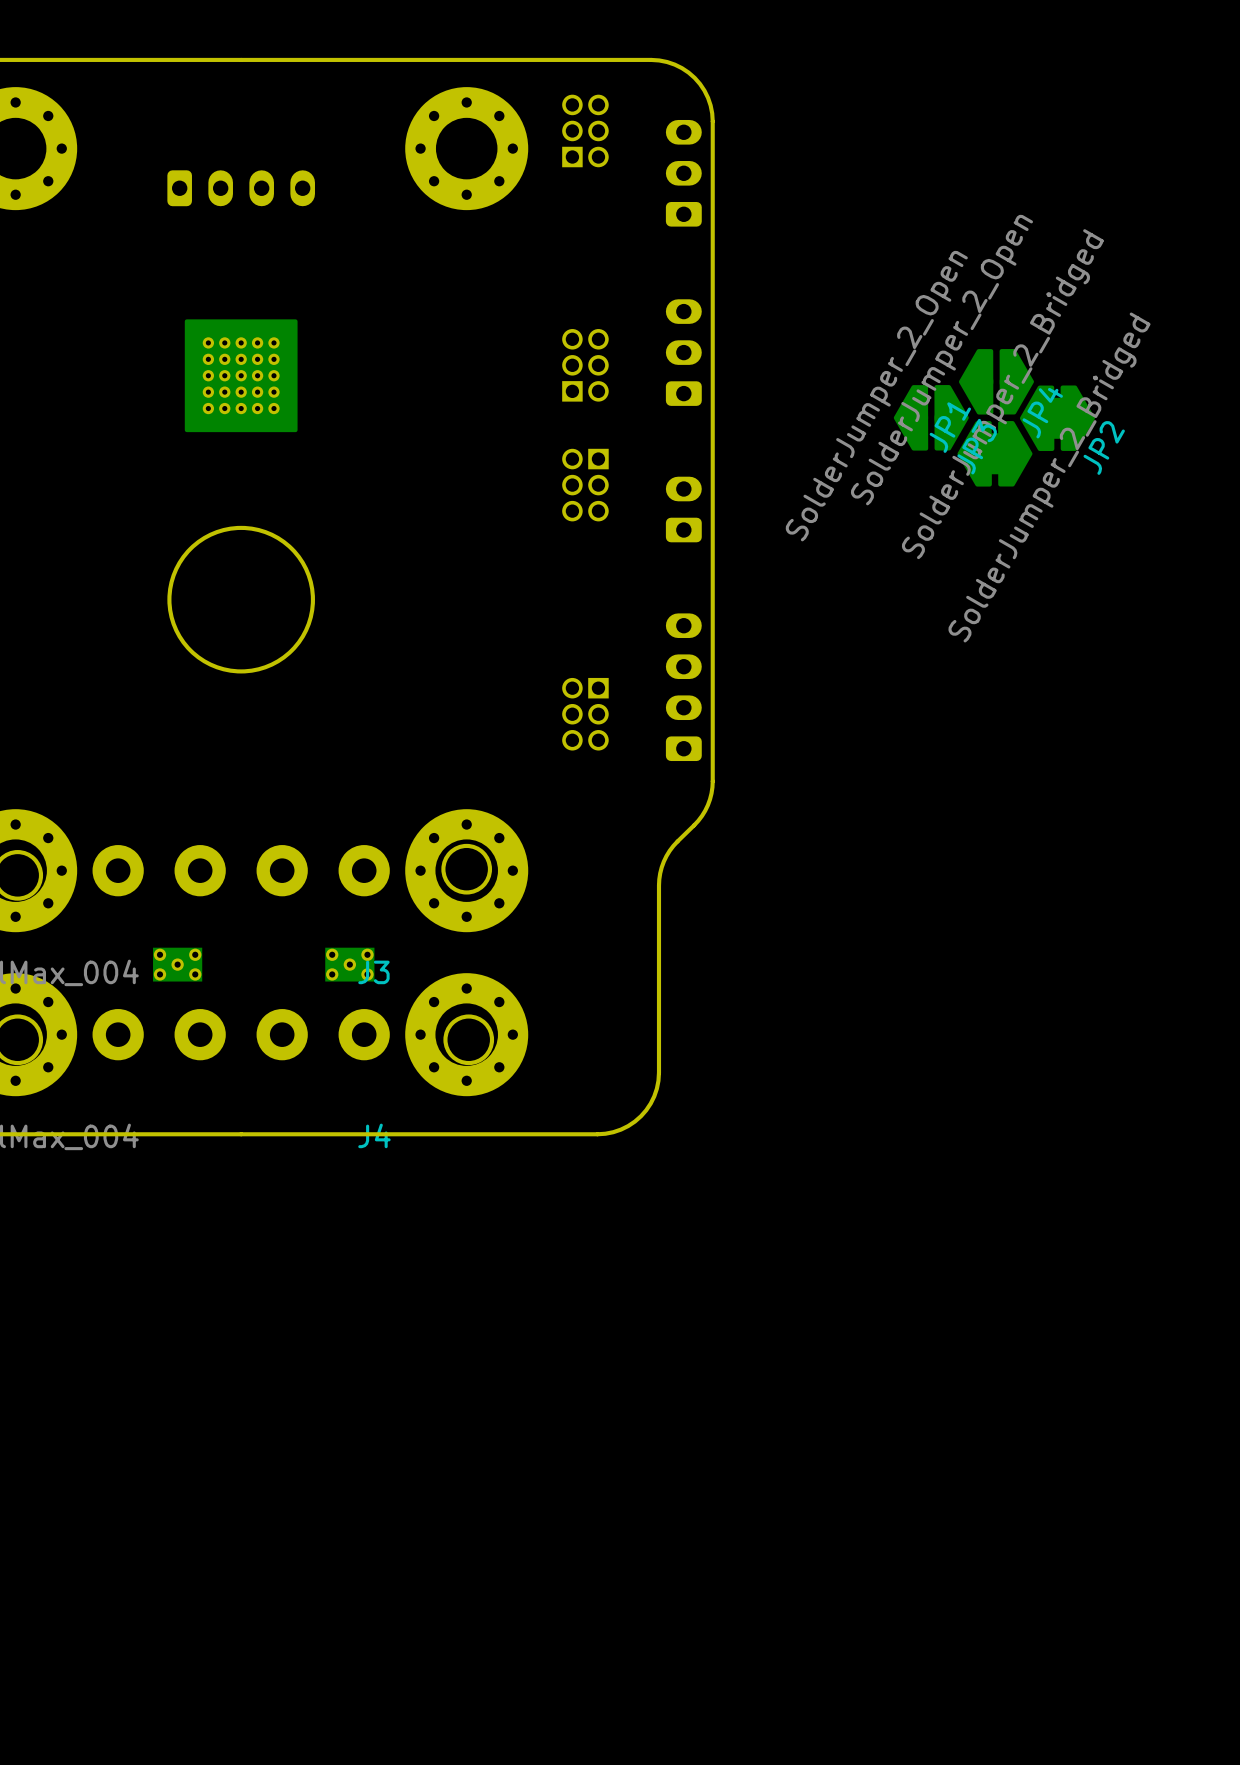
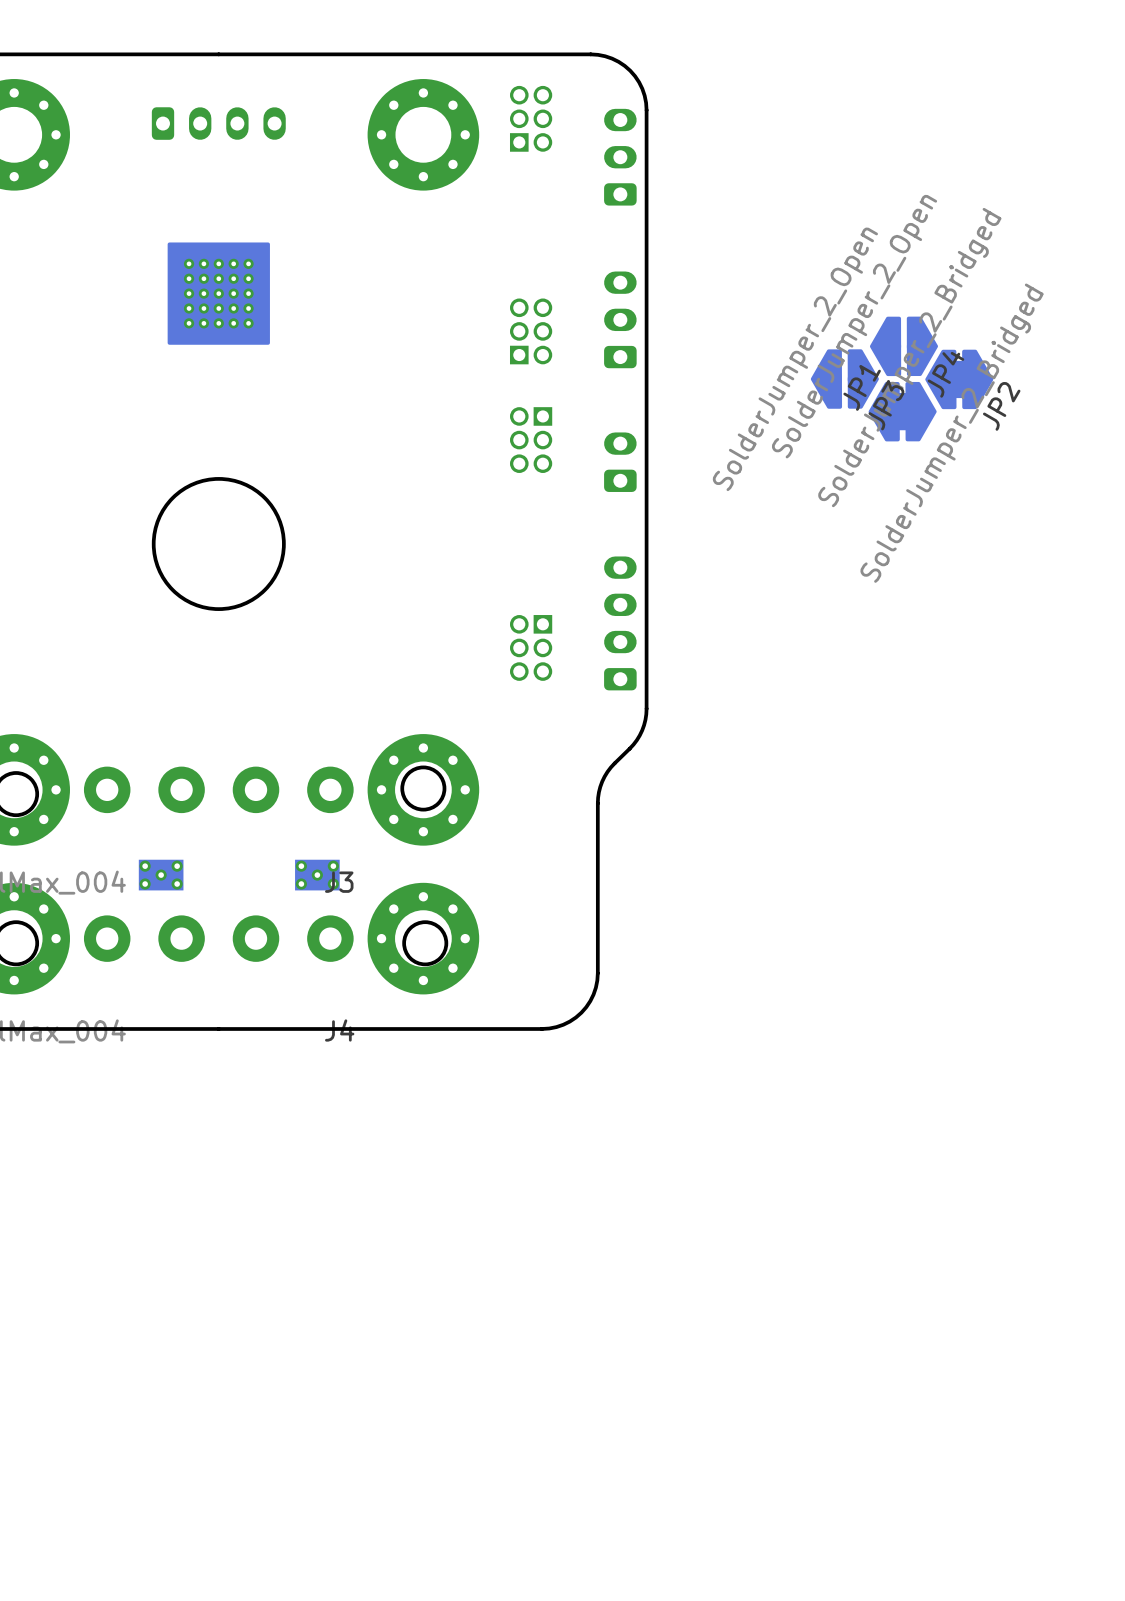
part position: (241, 188) -> (218, 123)
part position: (241, 375) -> (218, 293)

